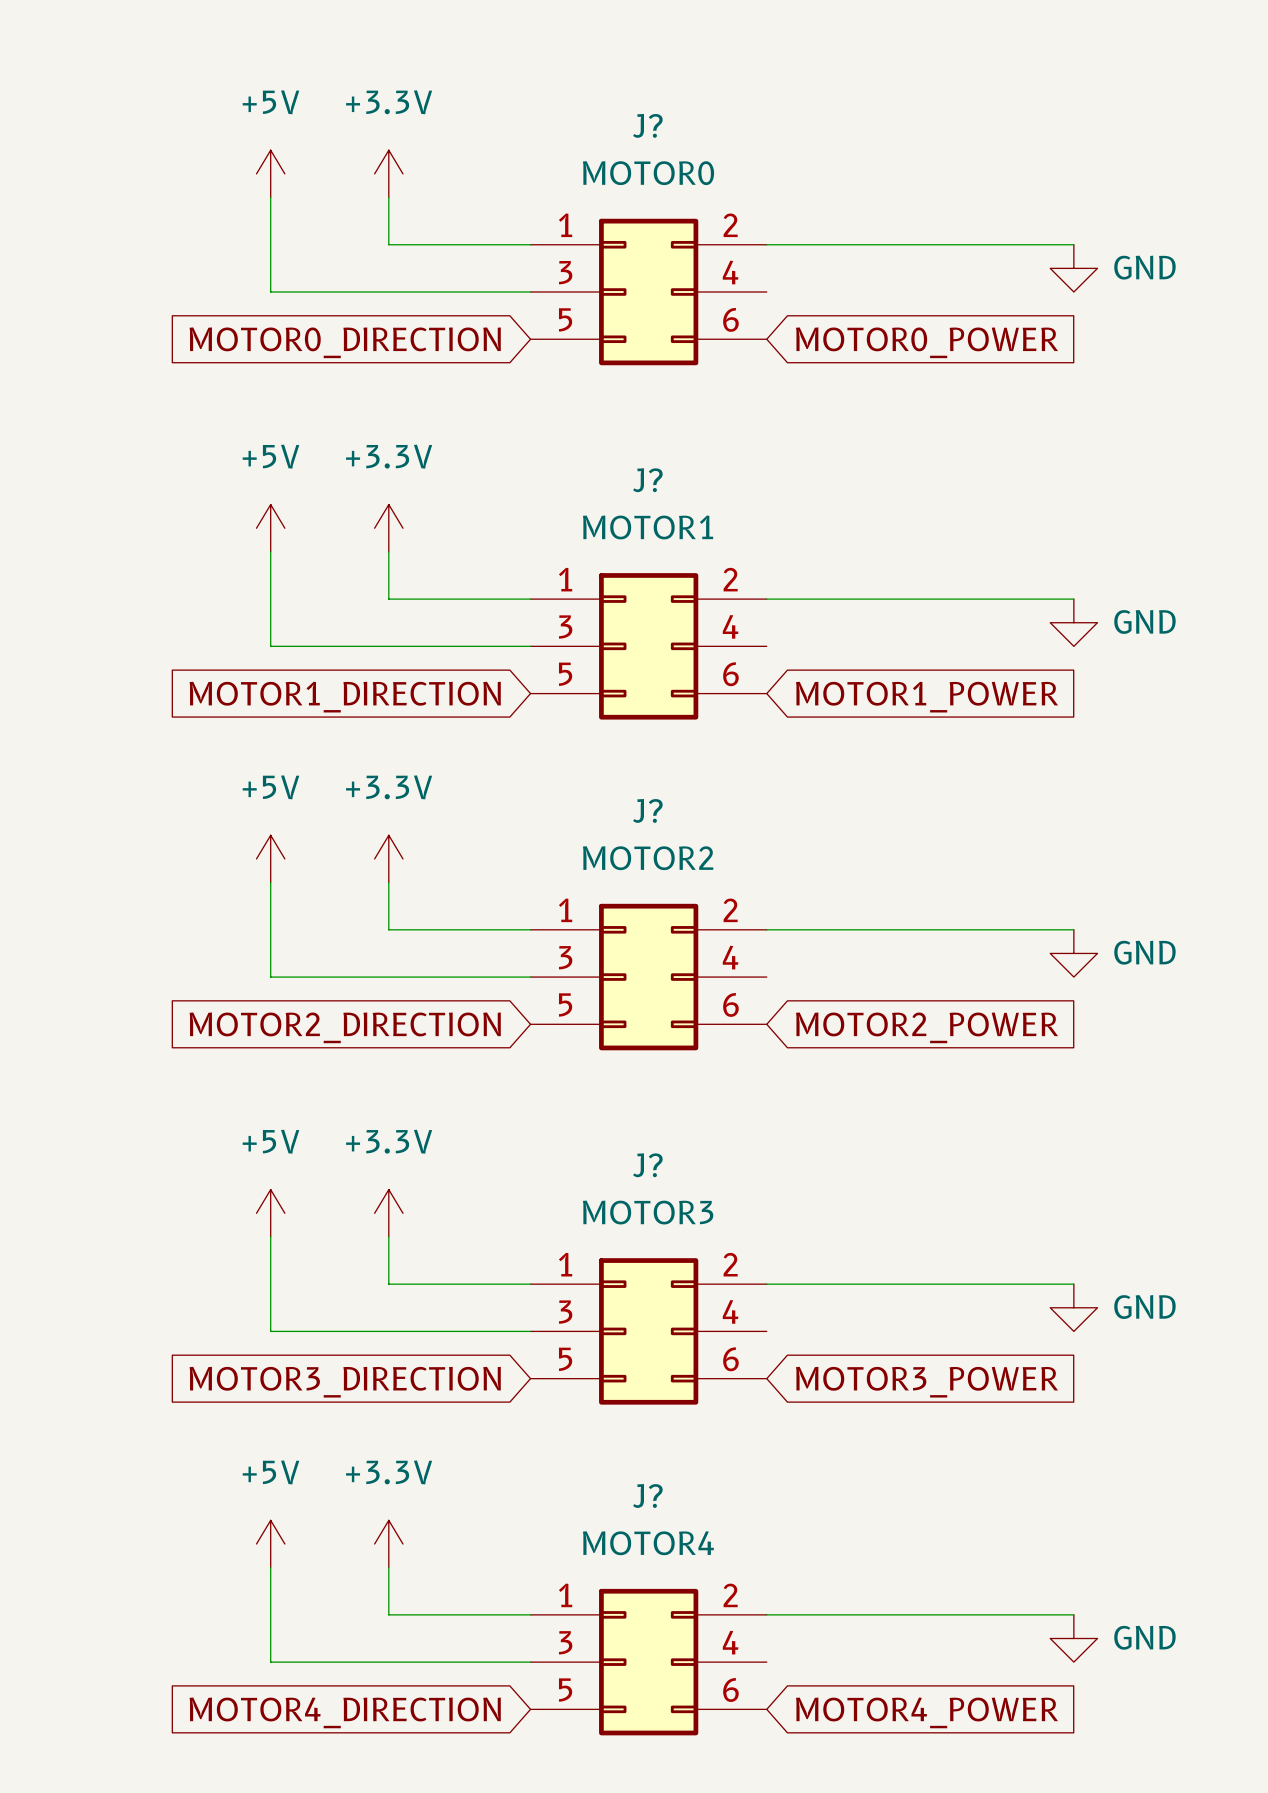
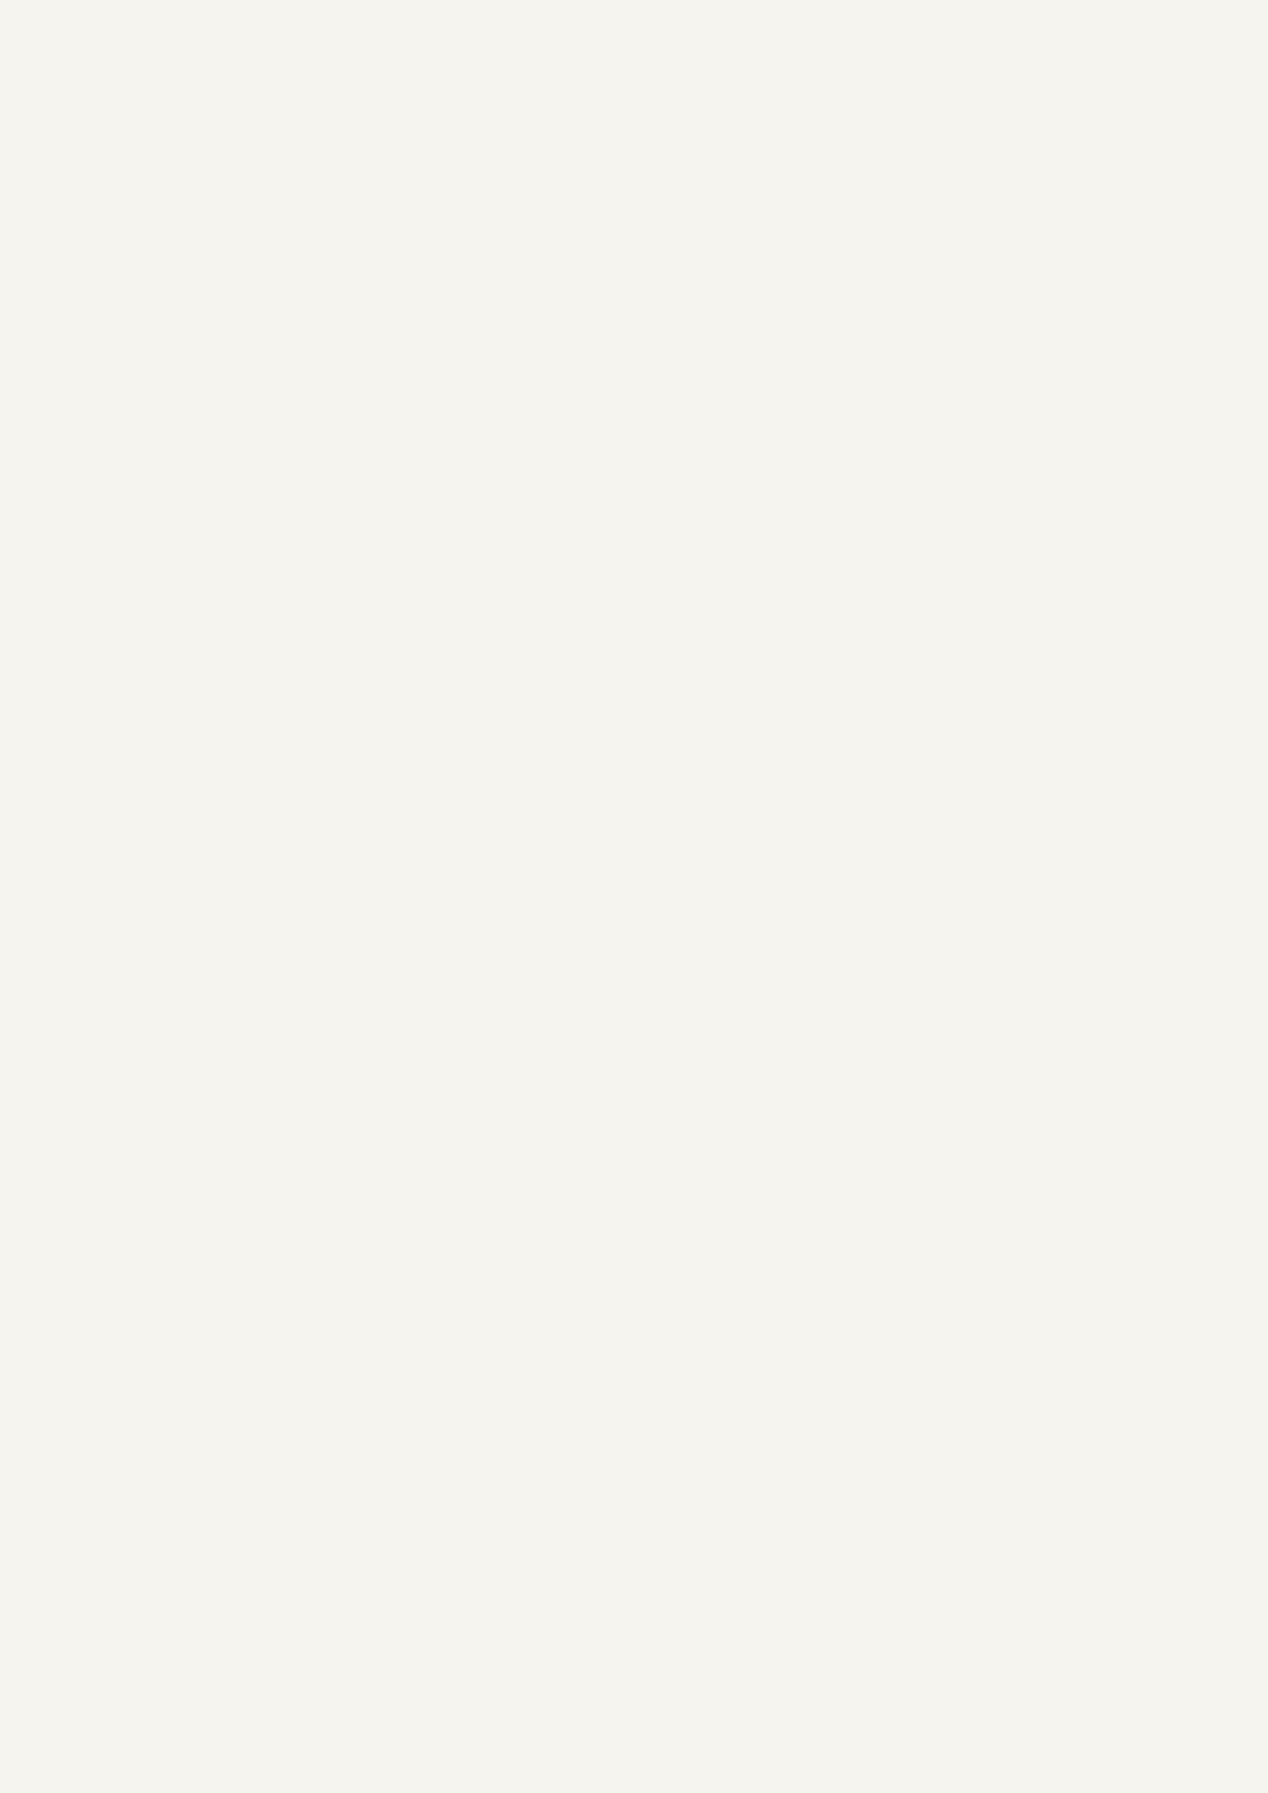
power symbol: +5V (270, 173) -> none
power symbol: +3.3V (388, 173) -> none
wire: (270, 197) (270, 292) (530, 292) -> none
wire: (388, 197) (388, 244) (530, 244) -> none
wire: (766, 244) (1073, 244) -> none
power symbol: GND (1073, 268) -> none
J?: MOTOR0 (648, 292) -> none
global label: MOTOR0_DIRECTION (345, 342) -> none
global label: MOTOR0_POWER (927, 342) -> none
power symbol: +5V (270, 528) -> none
power symbol: +3.3V (388, 528) -> none
wire: (270, 551) (270, 646) (530, 646) -> none
wire: (388, 551) (388, 599) (530, 599) -> none
wire: (766, 599) (1073, 599) -> none
power symbol: GND (1073, 622) -> none
J?: MOTOR1 (648, 646) -> none
global label: MOTOR1_DIRECTION (345, 697) -> none
global label: MOTOR1_POWER (927, 697) -> none
power symbol: +5V (270, 858) -> none
power symbol: +3.3V (388, 858) -> none
wire: (270, 882) (270, 977) (530, 977) -> none
wire: (388, 882) (388, 929) (530, 929) -> none
wire: (766, 929) (1073, 929) -> none
power symbol: GND (1073, 953) -> none
J?: MOTOR2 (648, 977) -> none
global label: MOTOR2_DIRECTION (345, 1027) -> none
global label: MOTOR2_POWER (927, 1027) -> none
power symbol: +5V (270, 1213) -> none
power symbol: +3.3V (388, 1213) -> none
wire: (270, 1236) (270, 1331) (530, 1331) -> none
wire: (388, 1236) (388, 1284) (530, 1284) -> none
wire: (766, 1284) (1073, 1284) -> none
power symbol: GND (1073, 1307) -> none
J?: MOTOR3 (648, 1331) -> none
global label: MOTOR3_DIRECTION (345, 1382) -> none
global label: MOTOR3_POWER (927, 1382) -> none
power symbol: +5V (270, 1544) -> none
power symbol: +3.3V (388, 1544) -> none
wire: (270, 1567) (270, 1662) (530, 1662) -> none
wire: (388, 1567) (388, 1614) (530, 1614) -> none
wire: (766, 1614) (1073, 1614) -> none
power symbol: GND (1073, 1638) -> none
J?: MOTOR4 (648, 1662) -> none
global label: MOTOR4_DIRECTION (345, 1712) -> none
global label: MOTOR4_POWER (927, 1712) -> none

